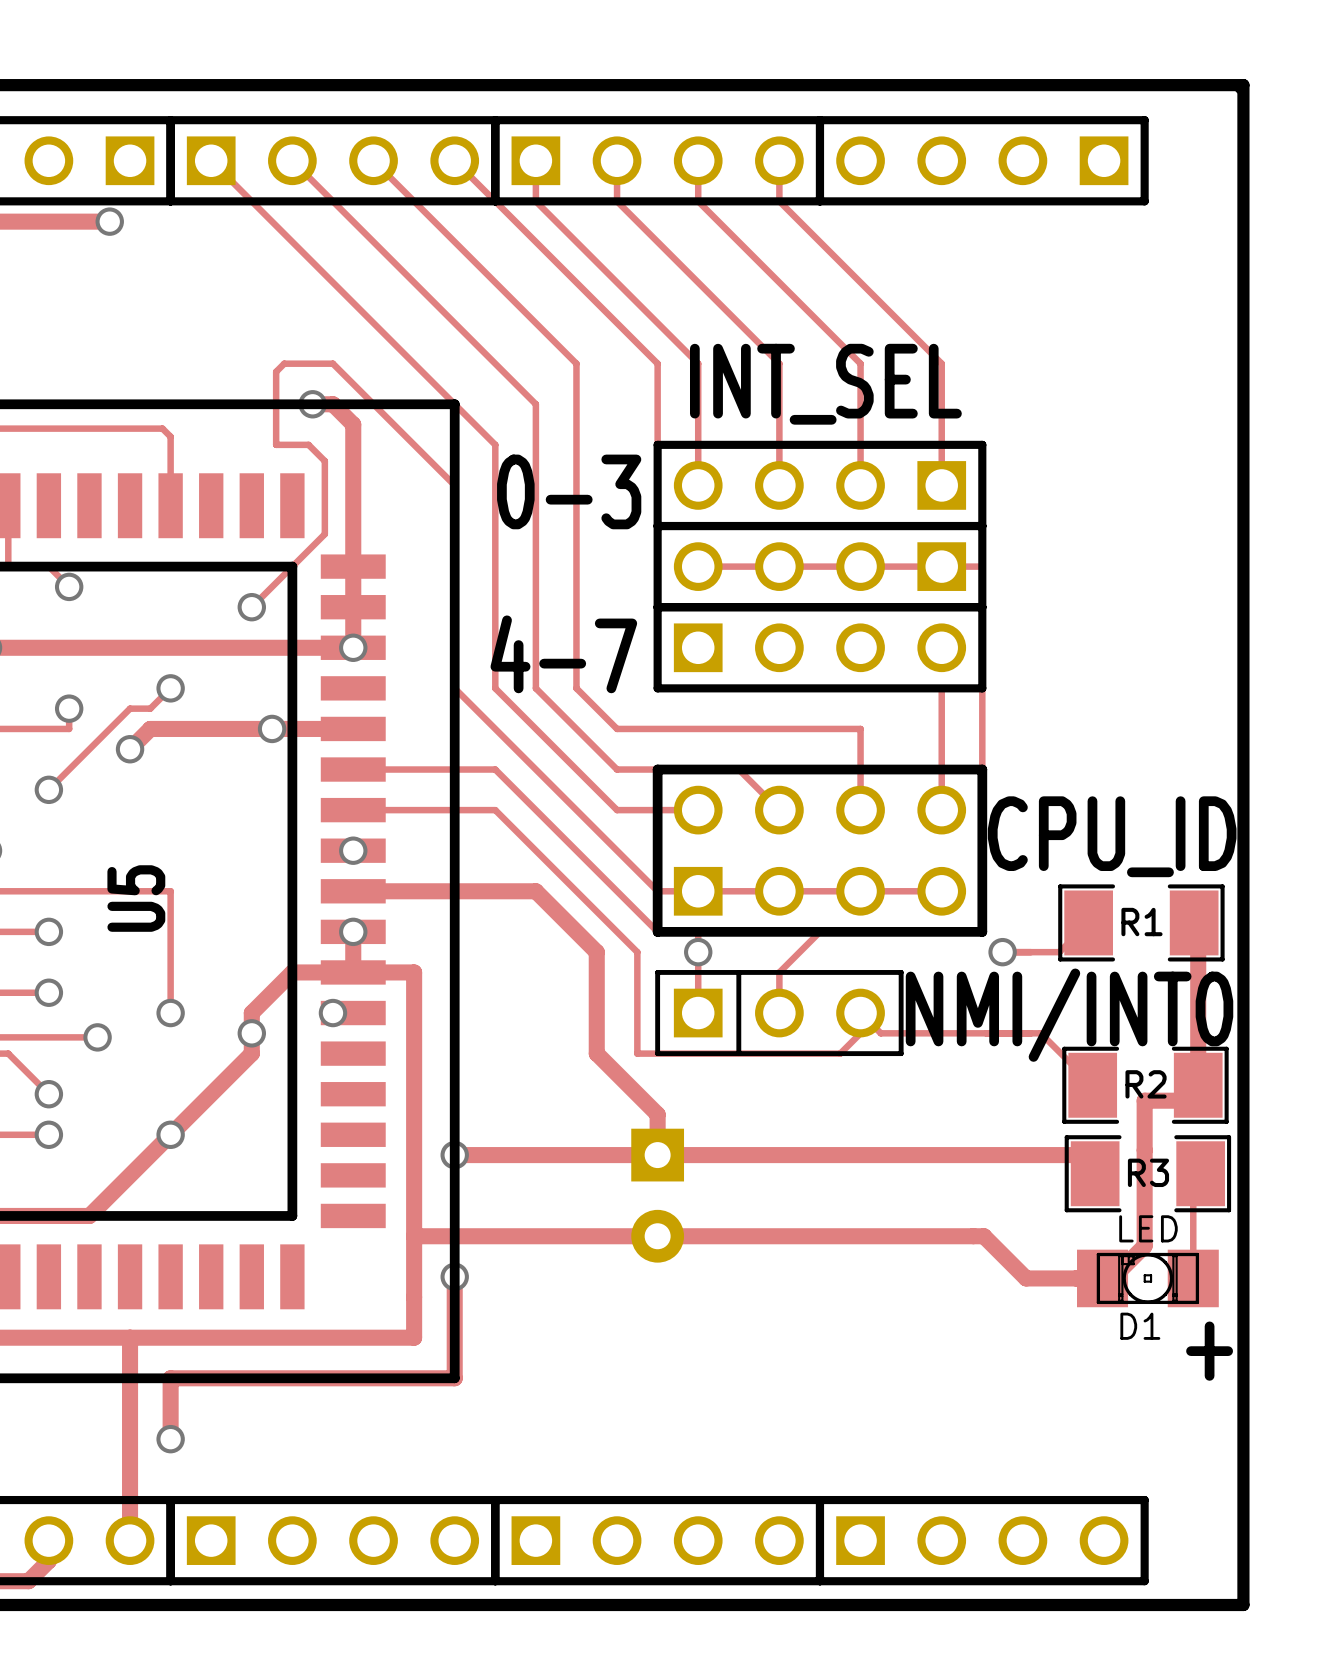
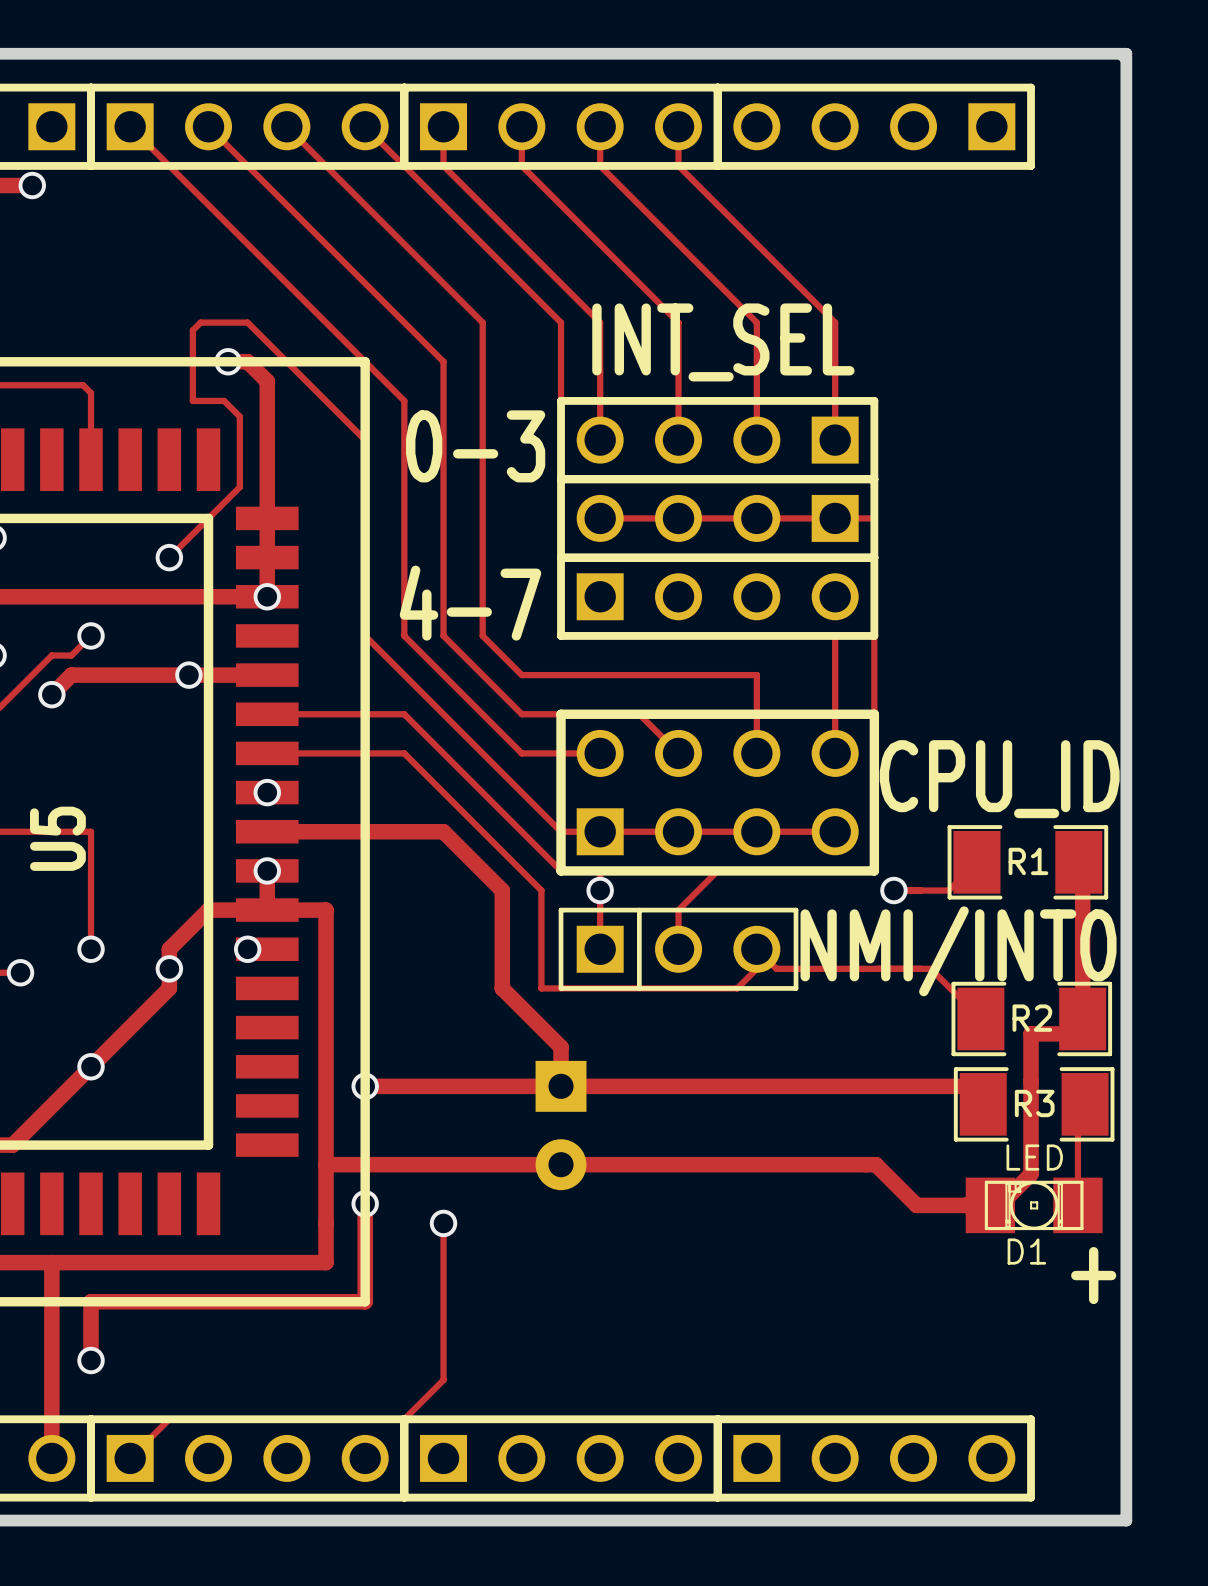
track: none -> (443, 1223) (443, 1380) (404, 1419) (169, 1419) (130, 1458)
via: none -> (443, 1223)

